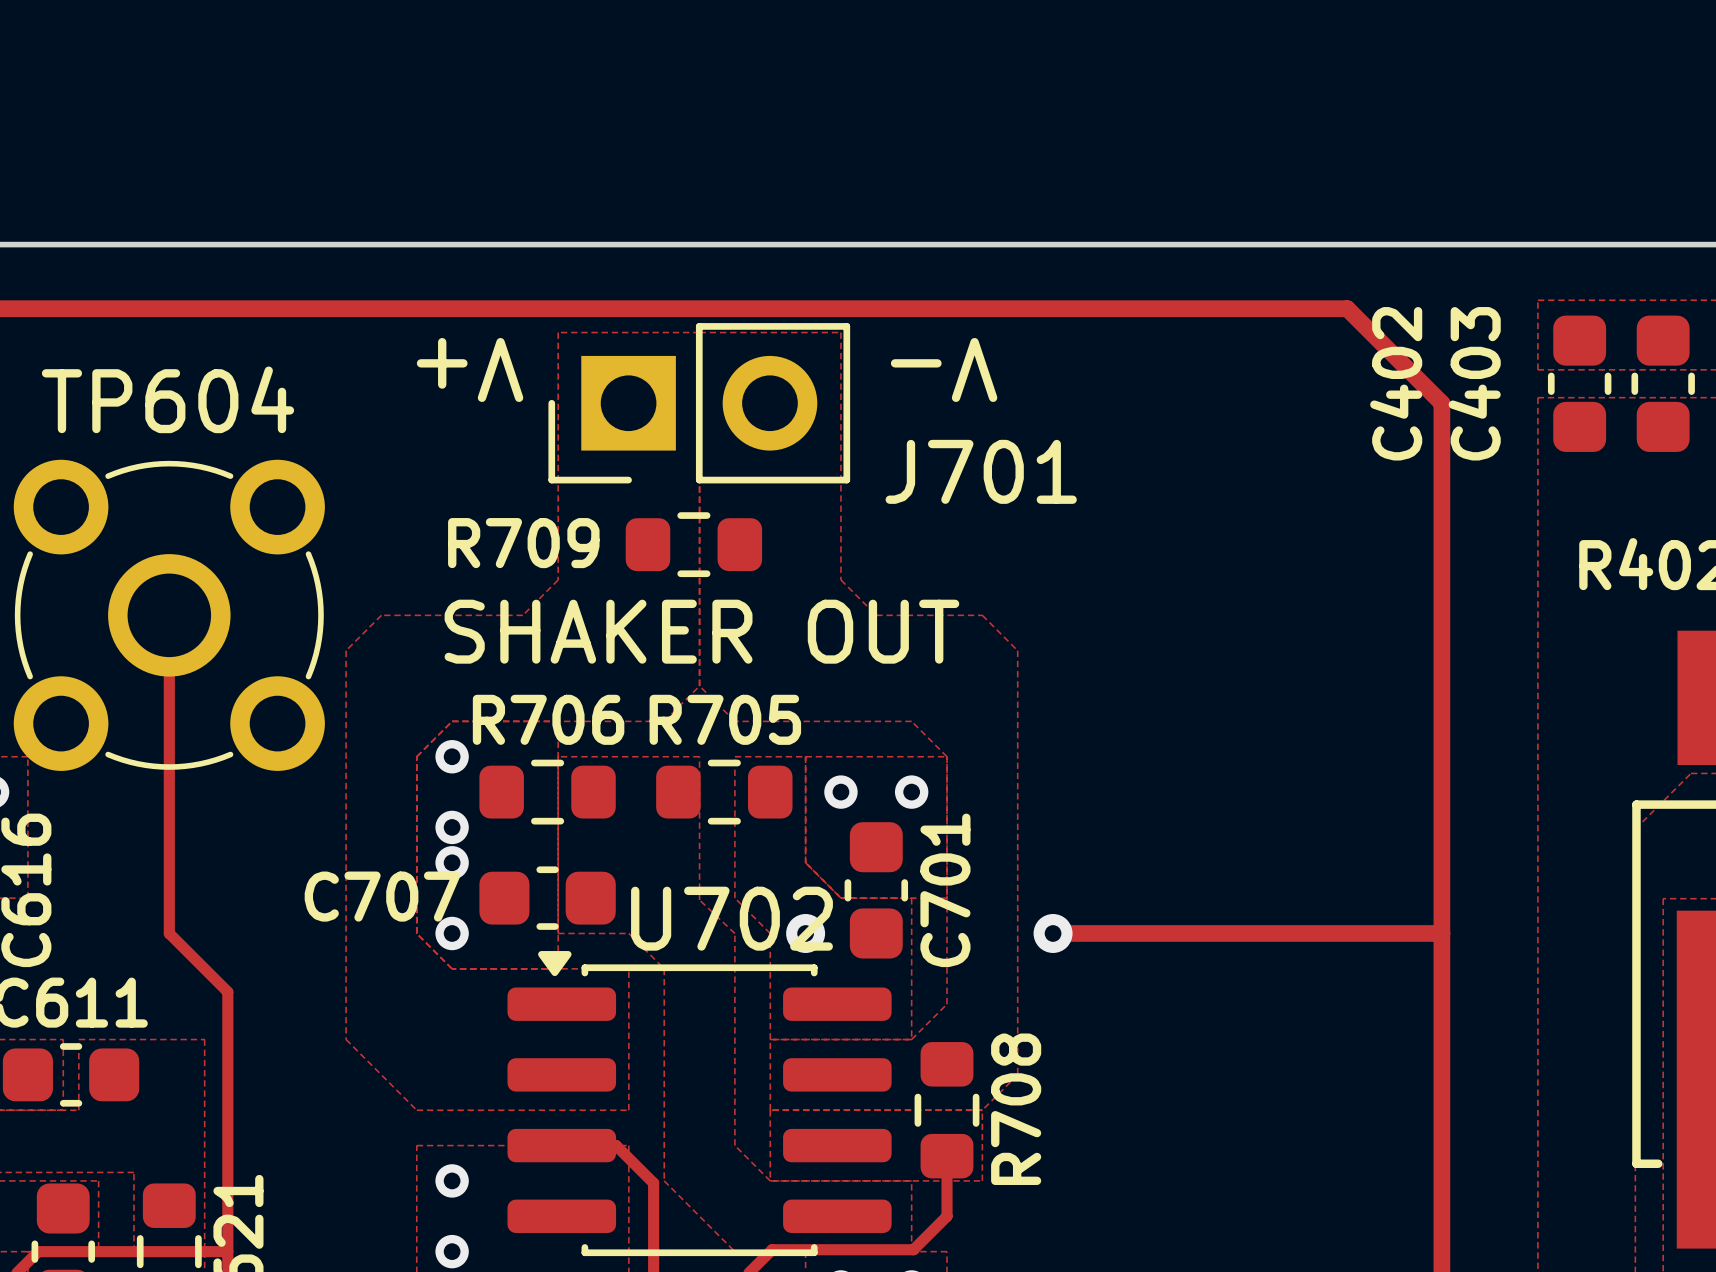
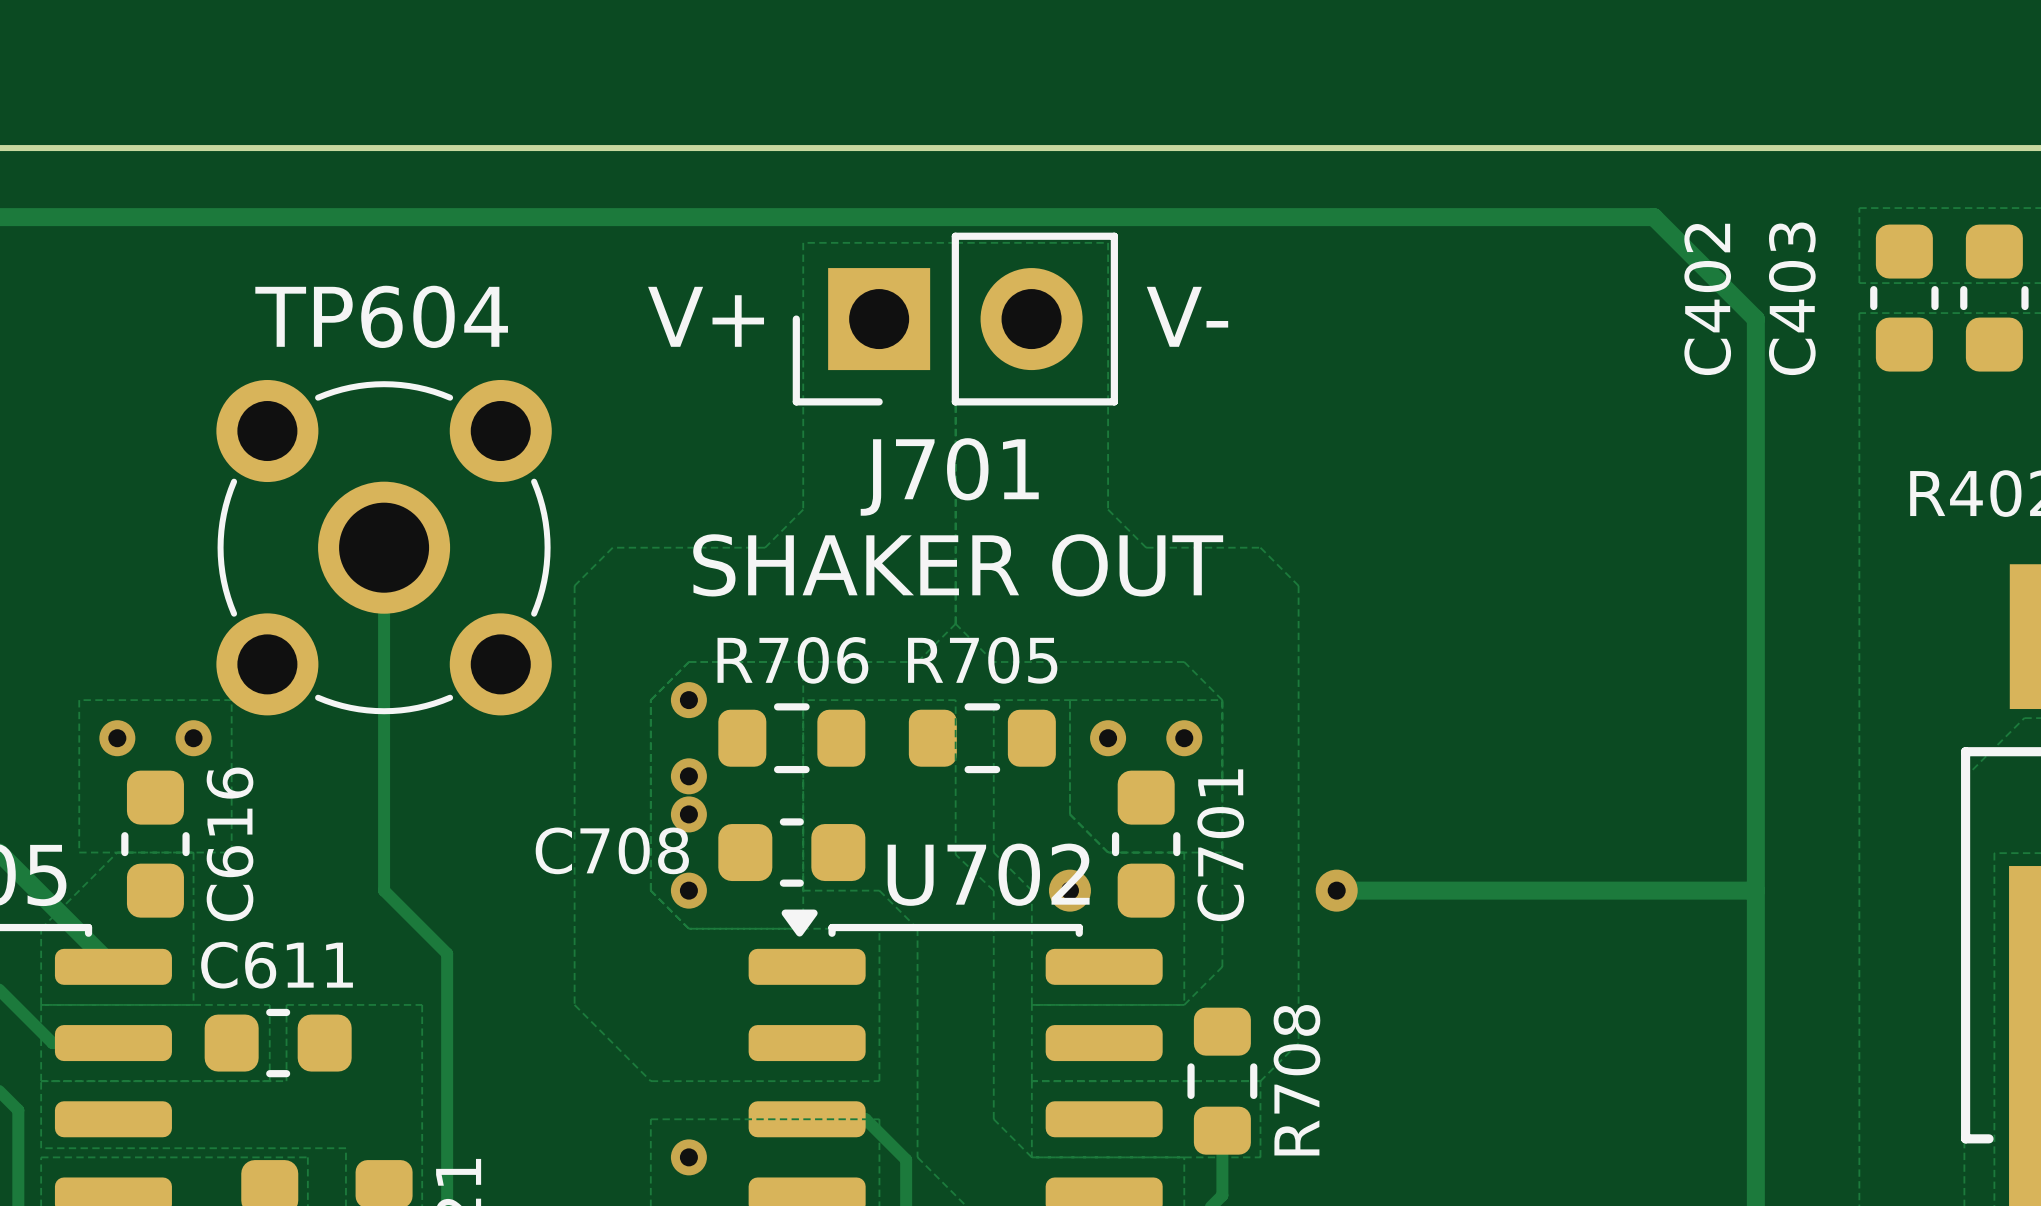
text rotation: 0° (470, 369) -> 180° (706, 316)
text rotation: 0° (944, 369) -> 180° (1187, 316)
J701 name position: J701 (981, 471) -> J701 (949, 476)
R709: (693, 544) -> none
C707 name: C707 (382, 896) -> C708 (612, 850)

